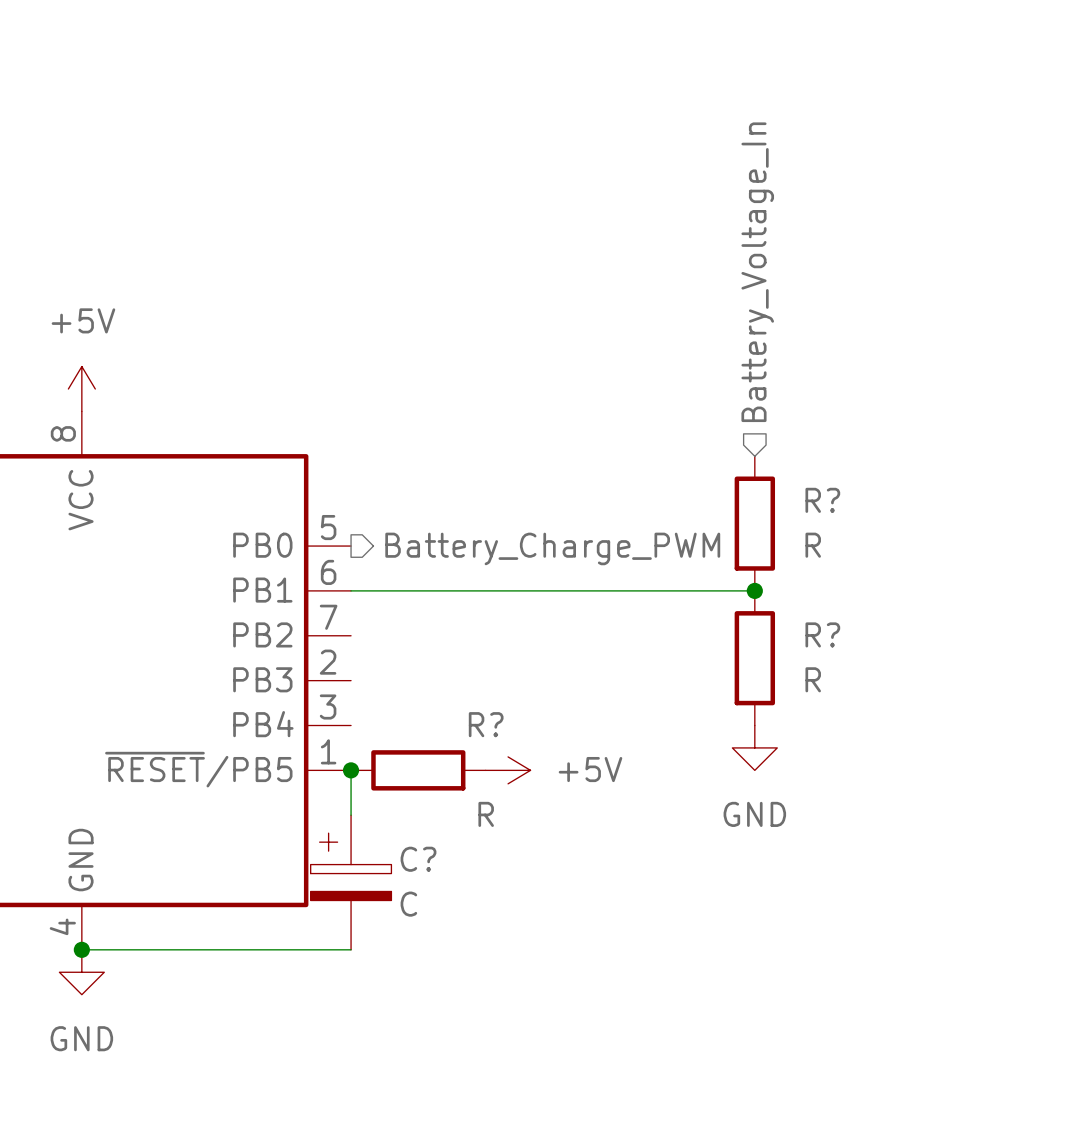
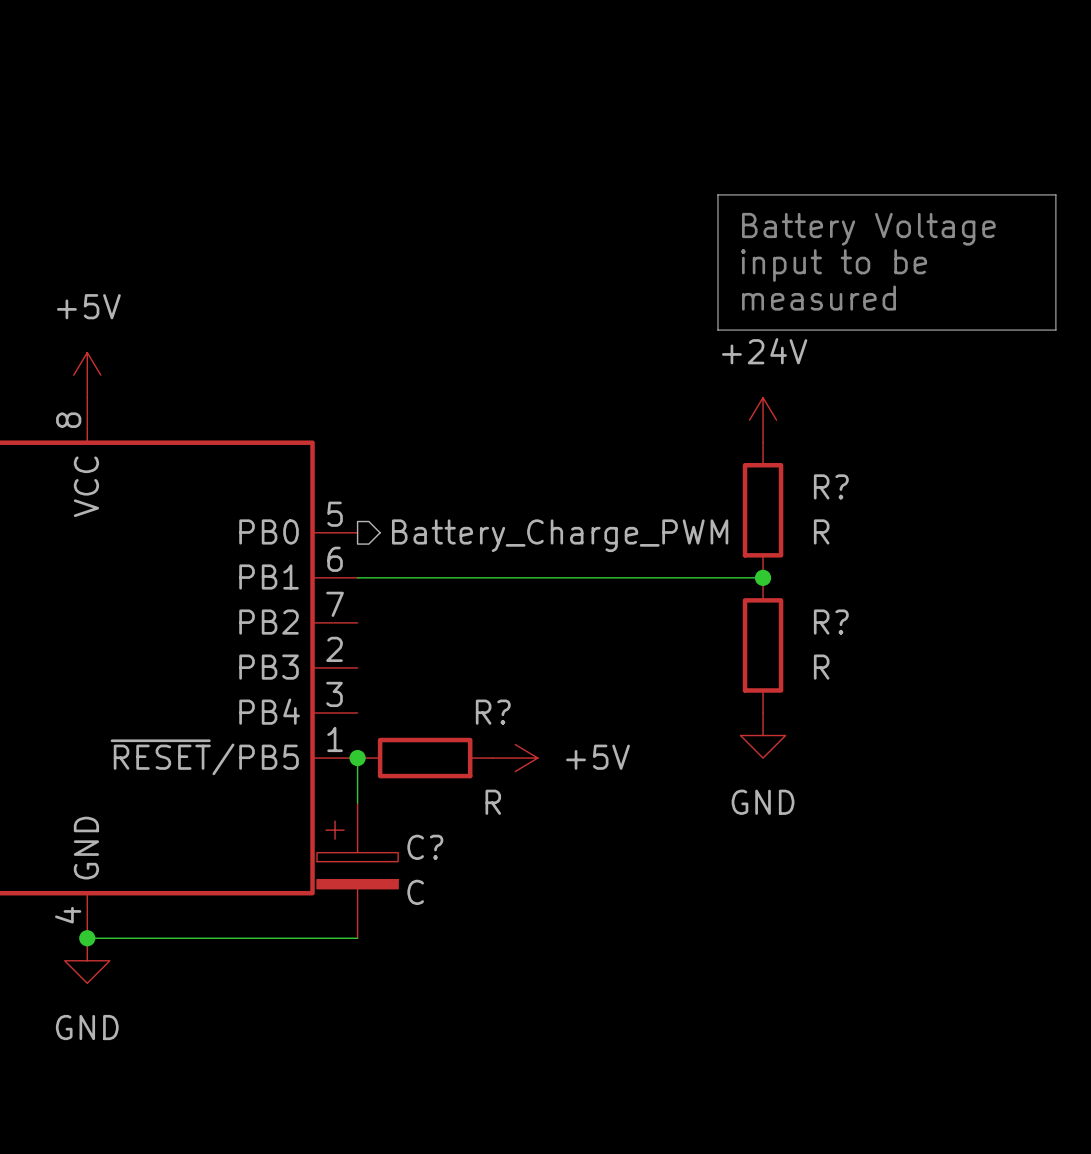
line: none -> (717, 194) (1055, 194) (1055, 330) (717, 330) (717, 194)
text: none -> Battery Voltage (868, 229)
hierarchical label: Battery_Voltage_In (757, 272) -> none
text: none -> input to be (834, 265)
text: none -> measured (818, 298)
power symbol: none -> +24V (763, 420)

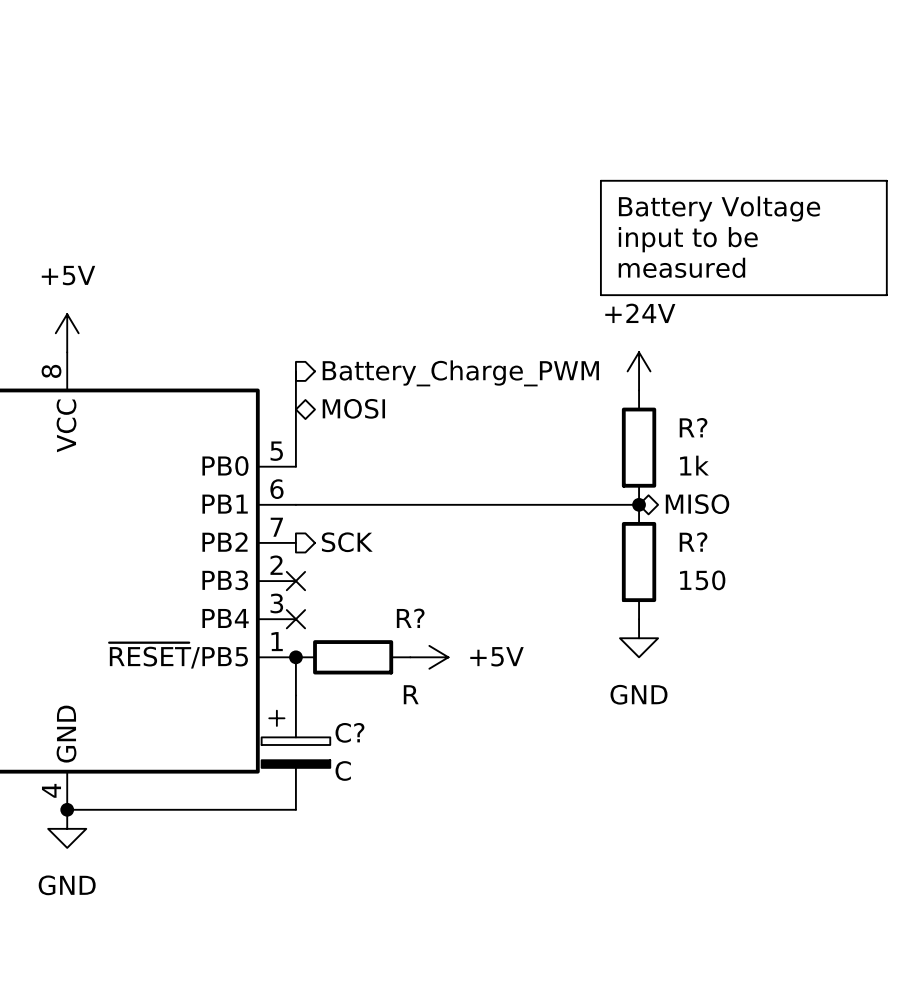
wire: none -> (295, 371) (295, 466)
hierarchical label: none -> MOSI (353, 408)
R? value: R (821, 531) -> 1k (694, 465)
hierarchical label position: Battery_Charge_PWM (560, 535) -> Battery_Charge_PWM (460, 373)
hierarchical label: none -> MISO (697, 504)
hierarchical label: none -> SCK (347, 542)
no-connect mark: none -> (295, 581)
R? value: R (821, 667) -> 150 (702, 580)
no-connect mark: none -> (295, 619)

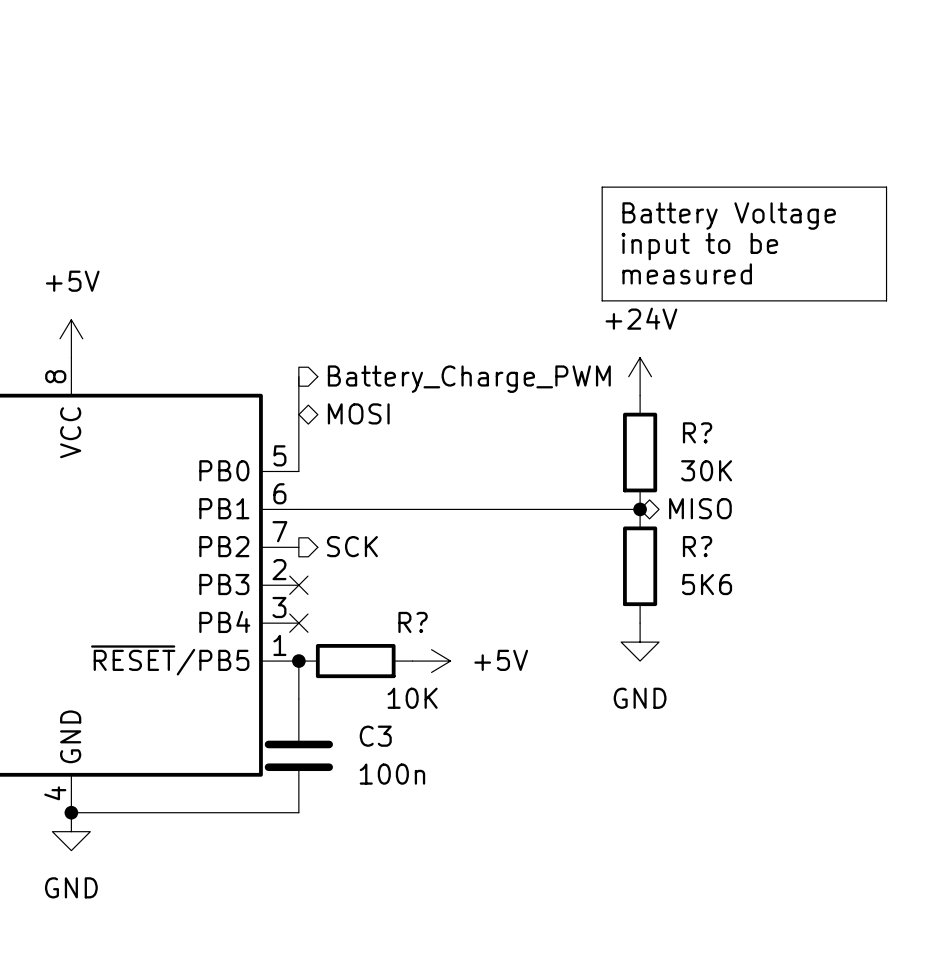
R? value: 1k (694, 465) -> 30K (706, 470)
R? value: 150 (702, 580) -> 5K6 (707, 584)
R? value: R (411, 694) -> 10K (412, 698)
C?: C (295, 752) -> none
C3: none -> 100n (298, 755)

